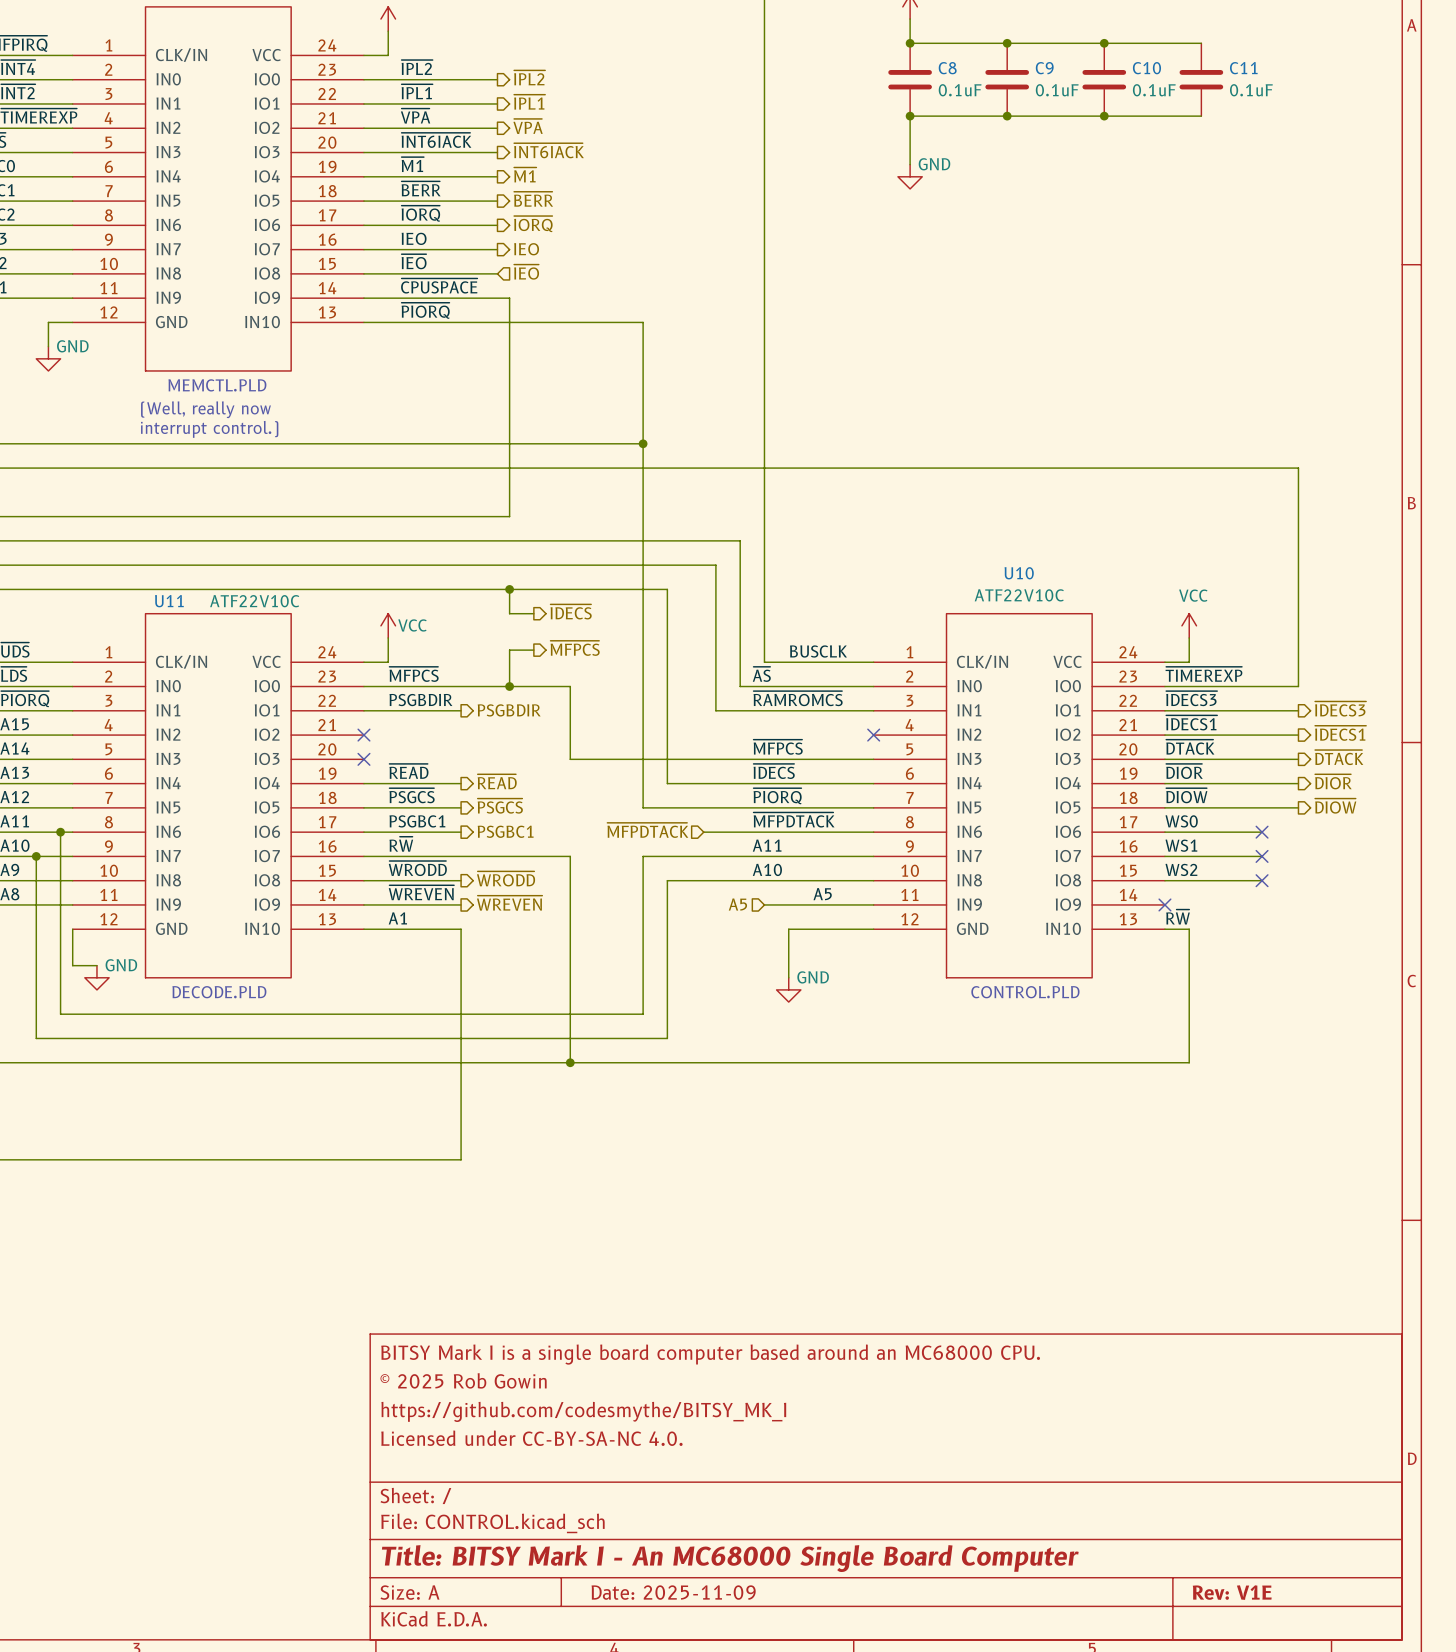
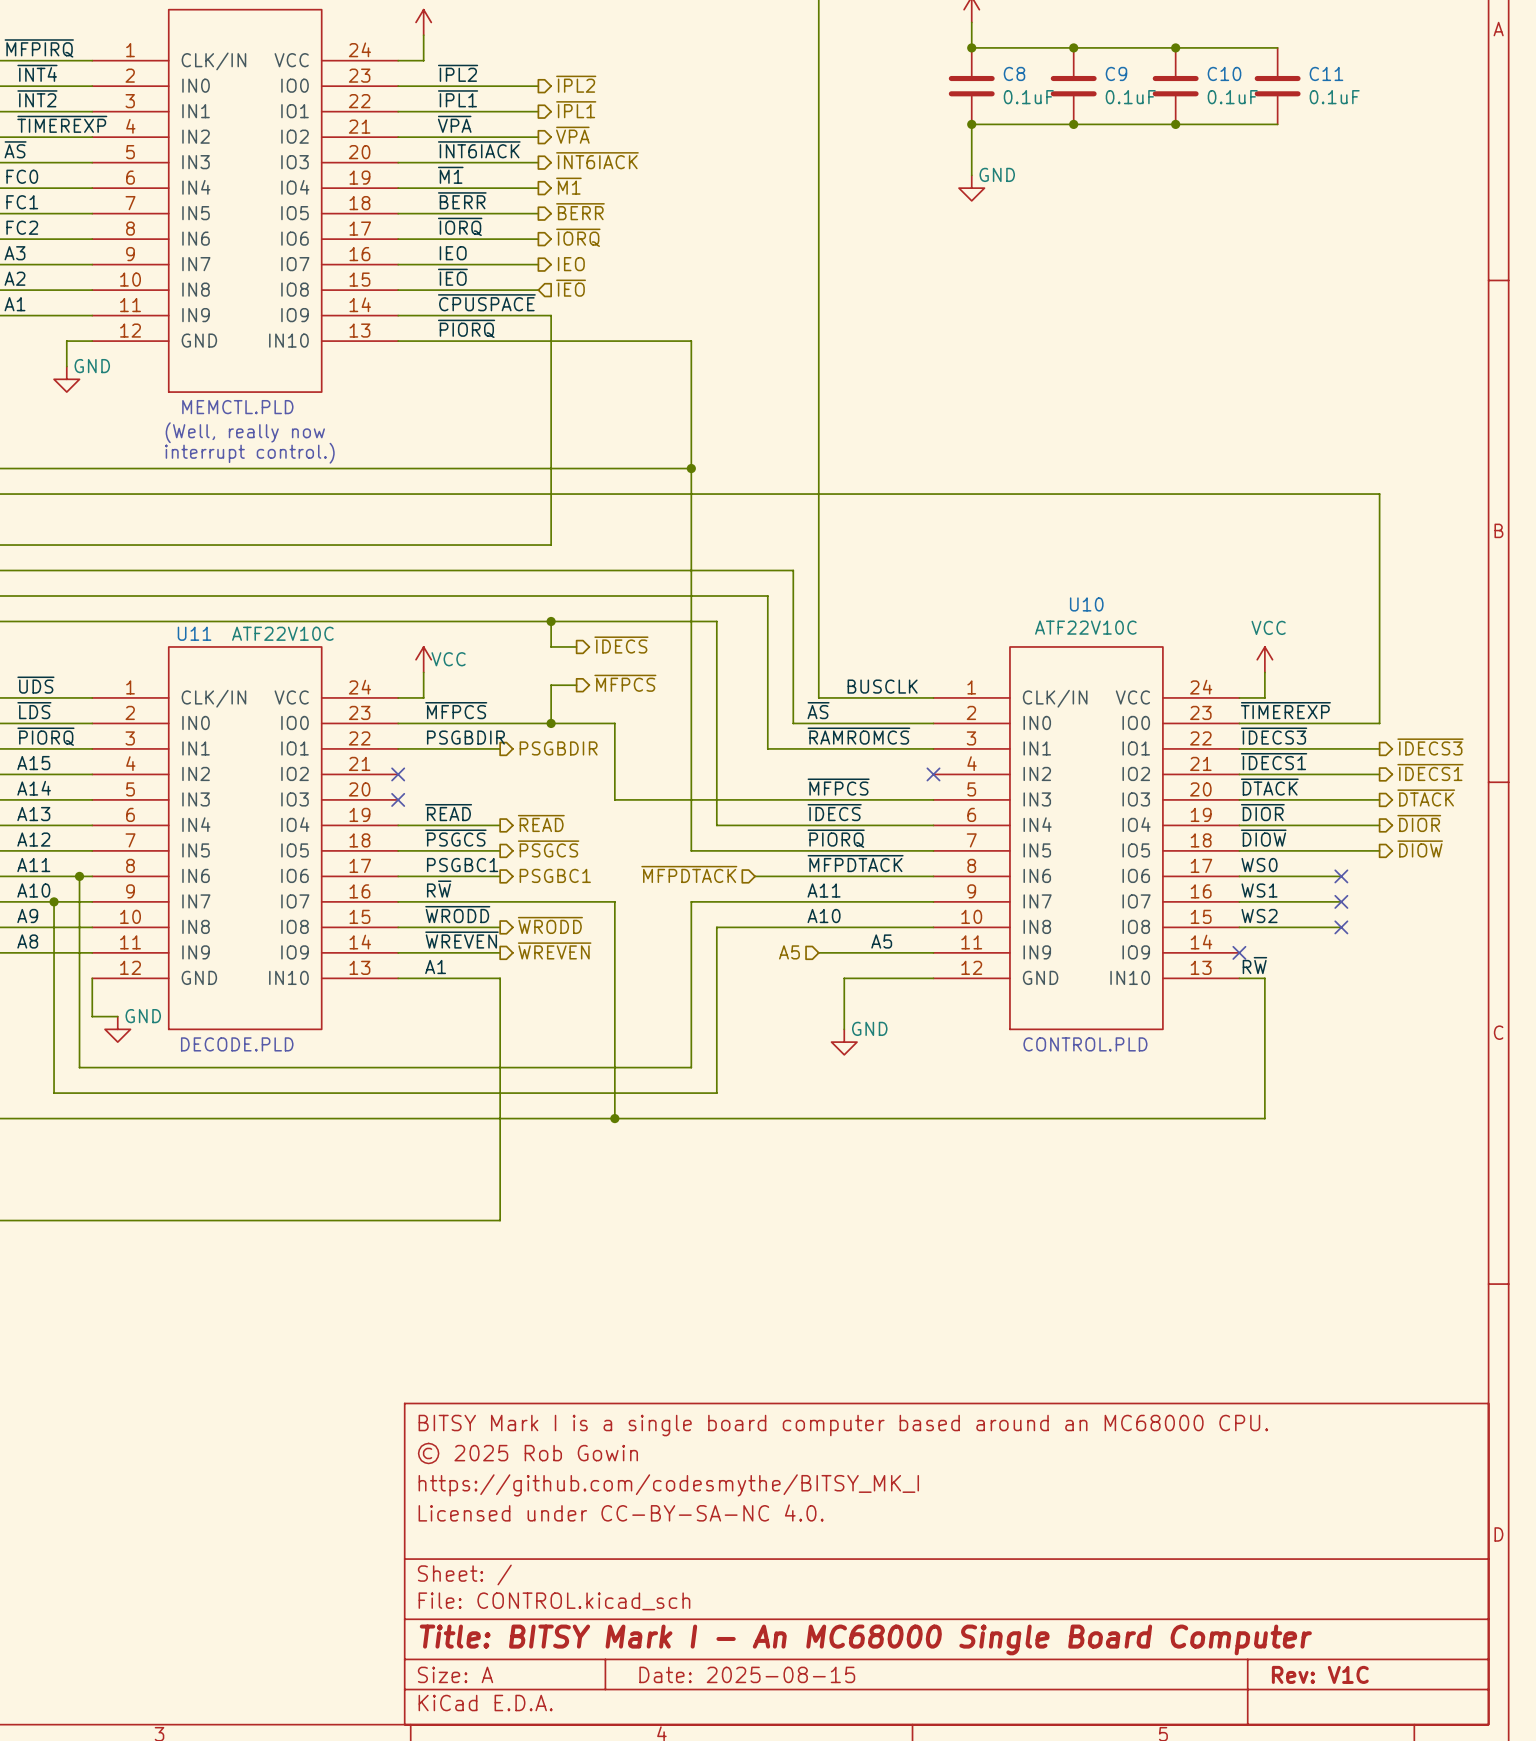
title block: Date: 2025-11-09 (673, 1592) -> Date: 2025-08-15 (747, 1674)
title block: Rev: V1E (1232, 1592) -> Rev: V1C (1320, 1674)

